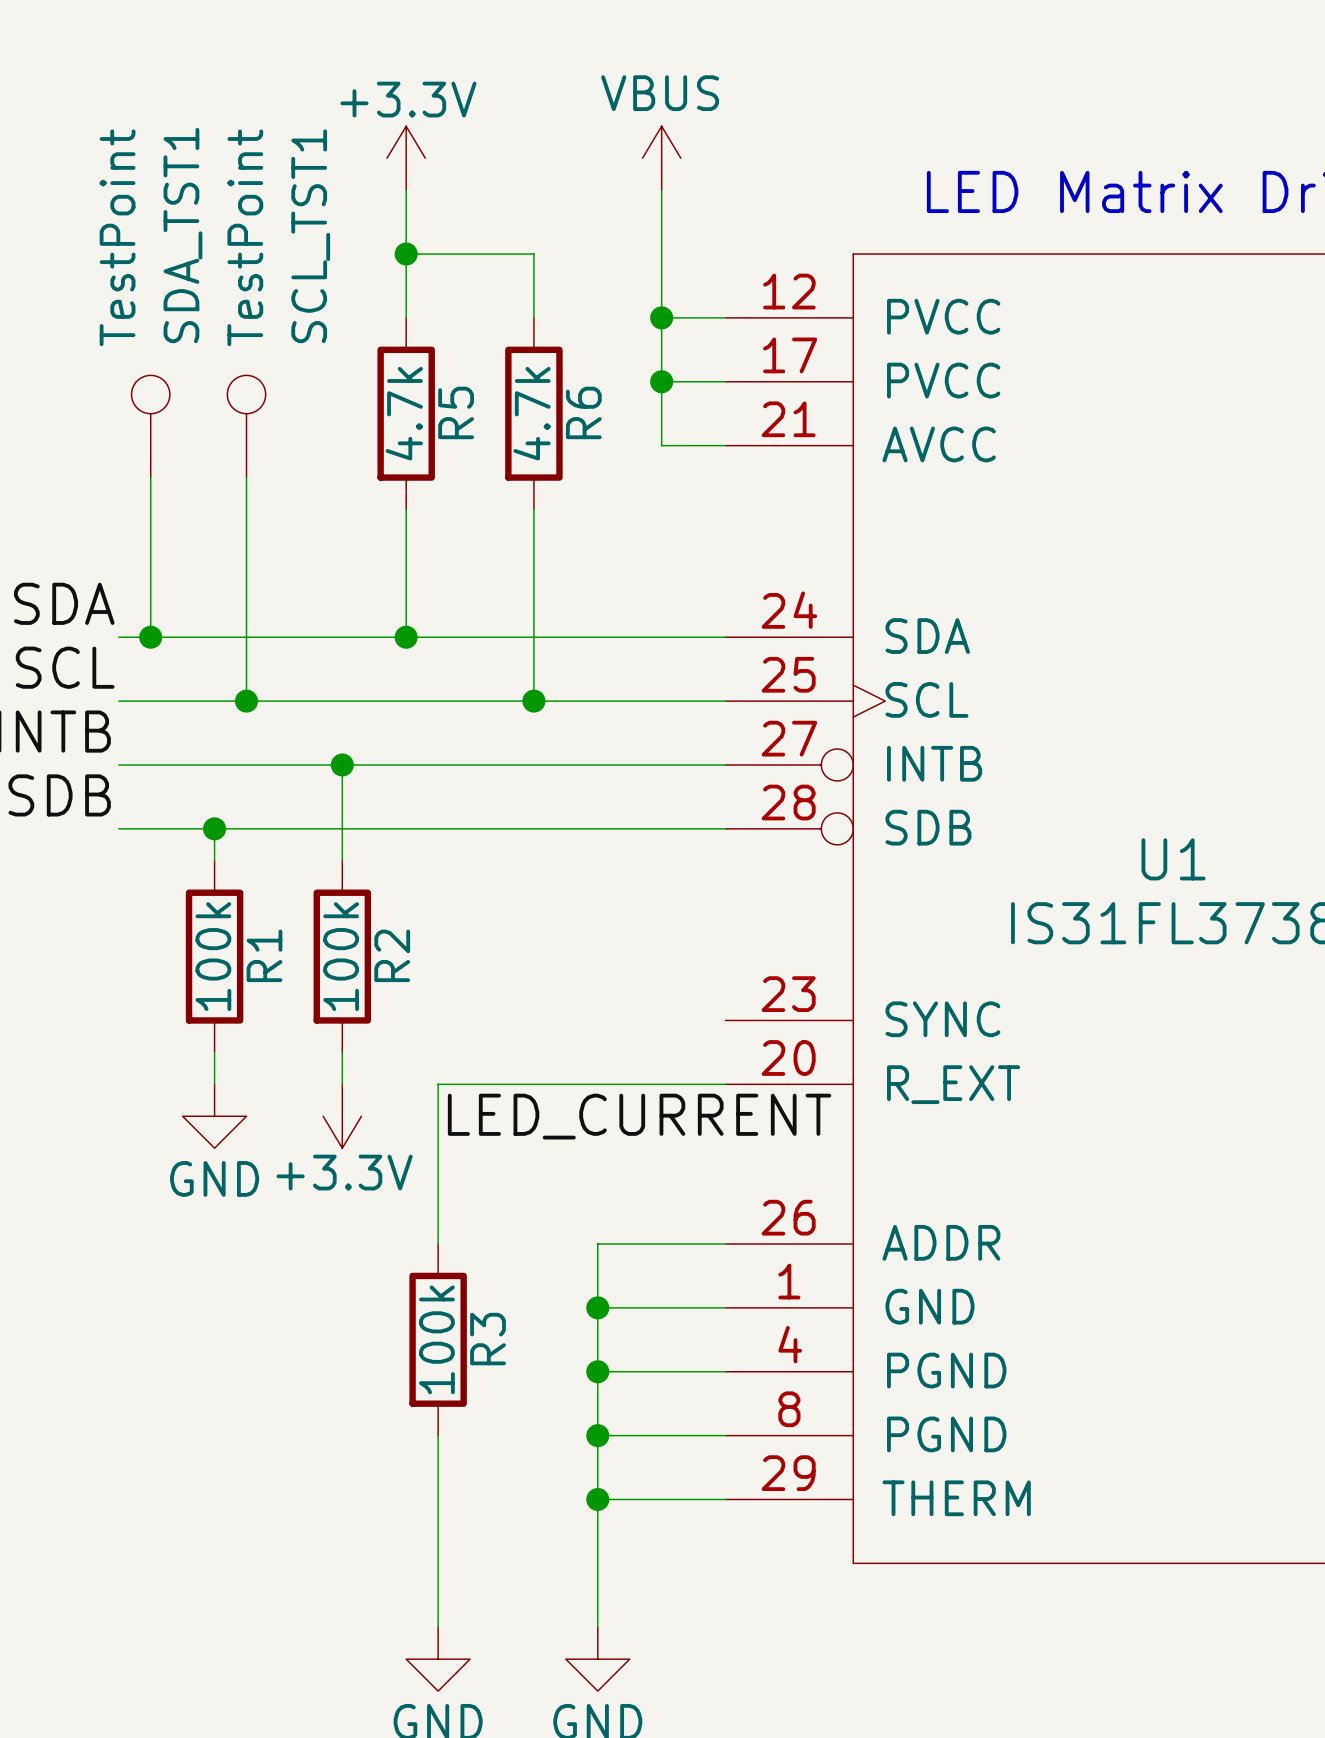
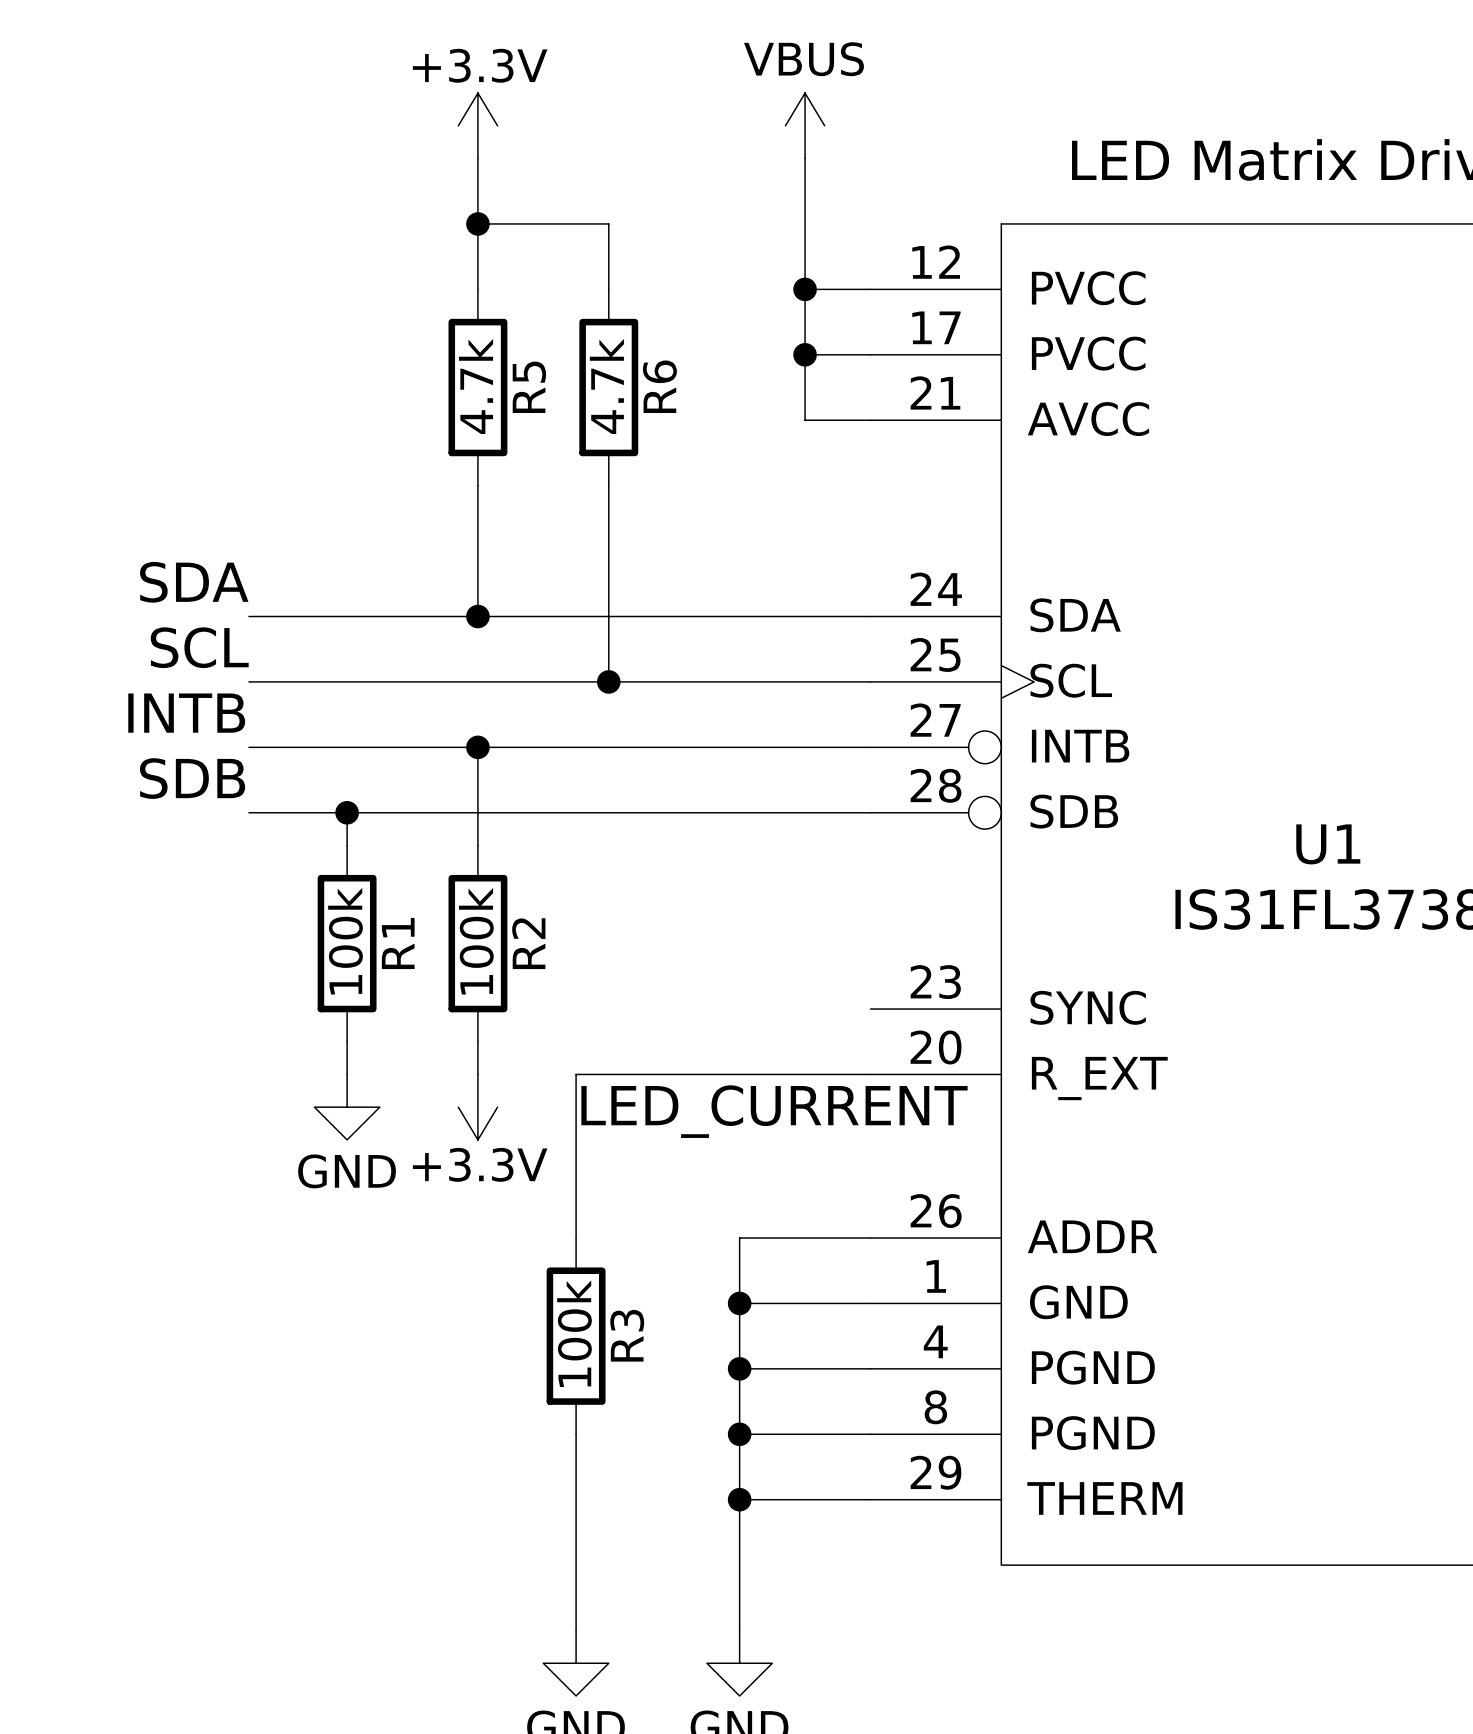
power symbol position: +3.3V (406, 158) -> +3.3V (477, 125)
wire: (406, 190) (406, 317) -> (477, 158) (477, 289)
wire: none -> (477, 223) (543, 223)
junction position: (406, 254) -> (477, 223)
wire: (470, 254) (533, 254) (533, 317) -> (608, 223) (608, 289)
R5 position: (406, 413) -> (477, 387)
R6 position: (533, 413) -> (608, 387)
SDA_TST1: TestPoint (150, 426) -> none
SCL_TST1: TestPoint (246, 426) -> none
wire: (150, 477) (150, 637) -> none
wire: (246, 477) (246, 701) -> none
wire: (406, 509) (406, 637) -> (477, 485) (477, 616)
wire: (533, 509) (533, 701) -> (608, 485) (608, 681)
junction: (150, 637) -> none
junction: none -> (477, 616)
junction: (406, 637) -> none
junction: (246, 701) -> none
junction: none -> (608, 681)
junction: (533, 701) -> none

